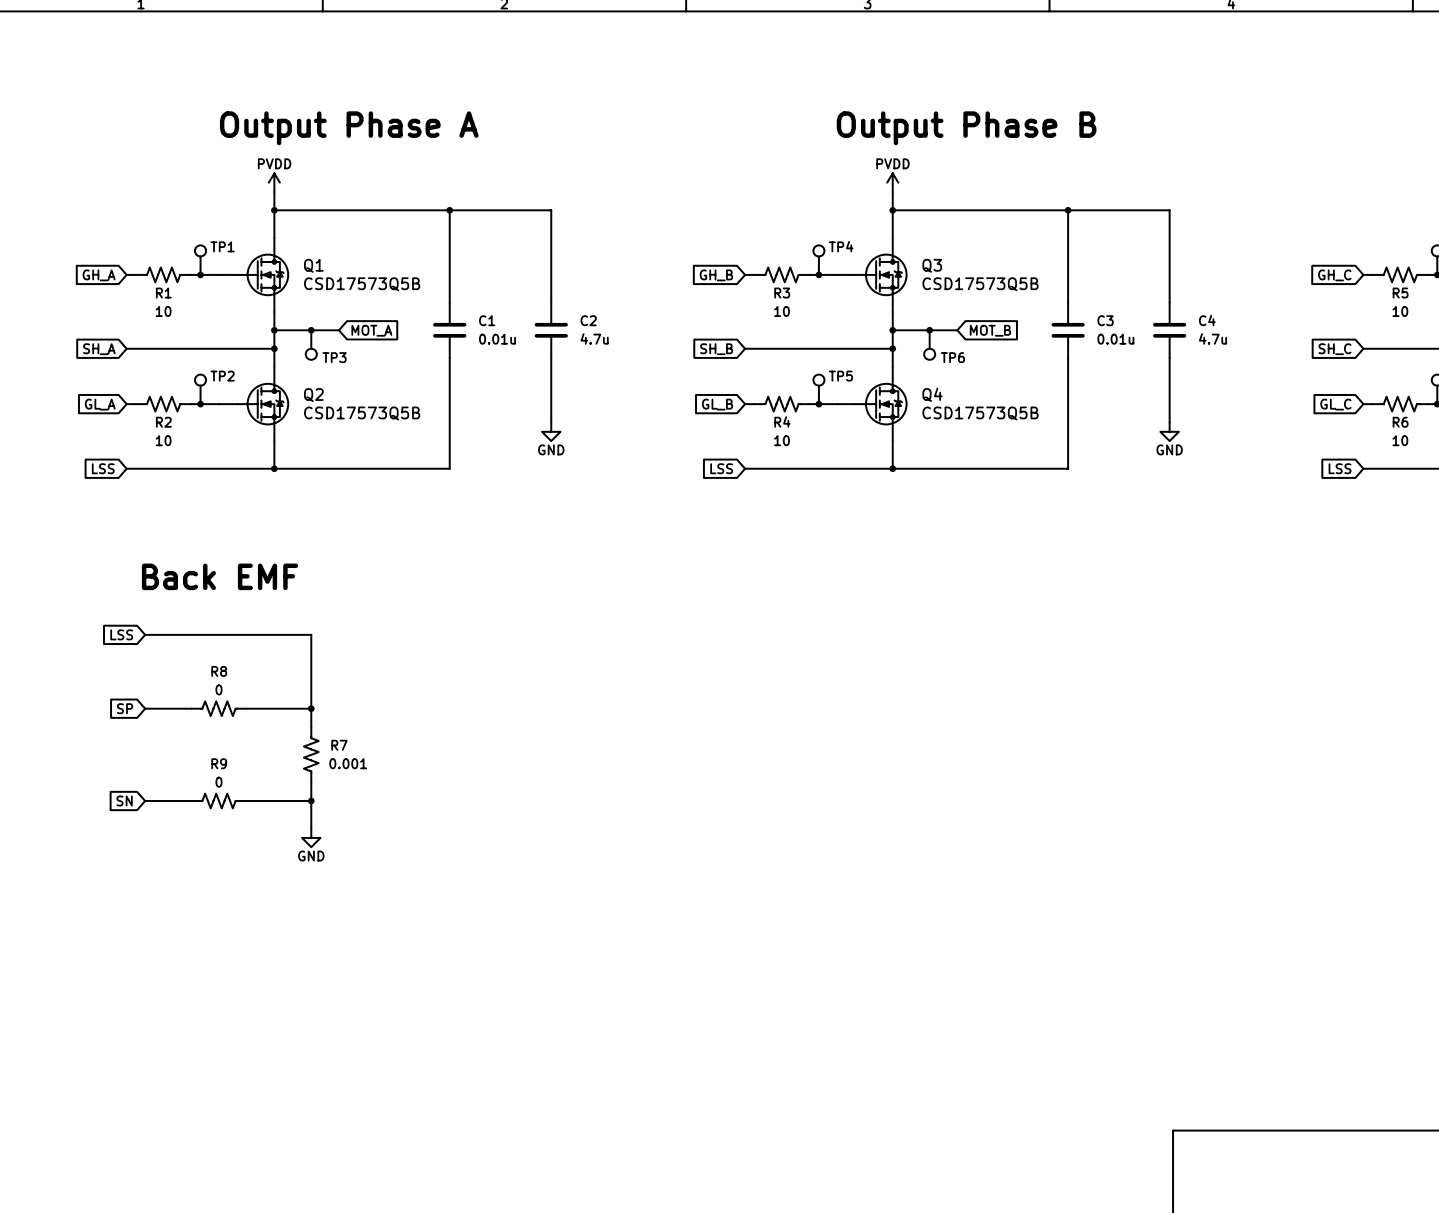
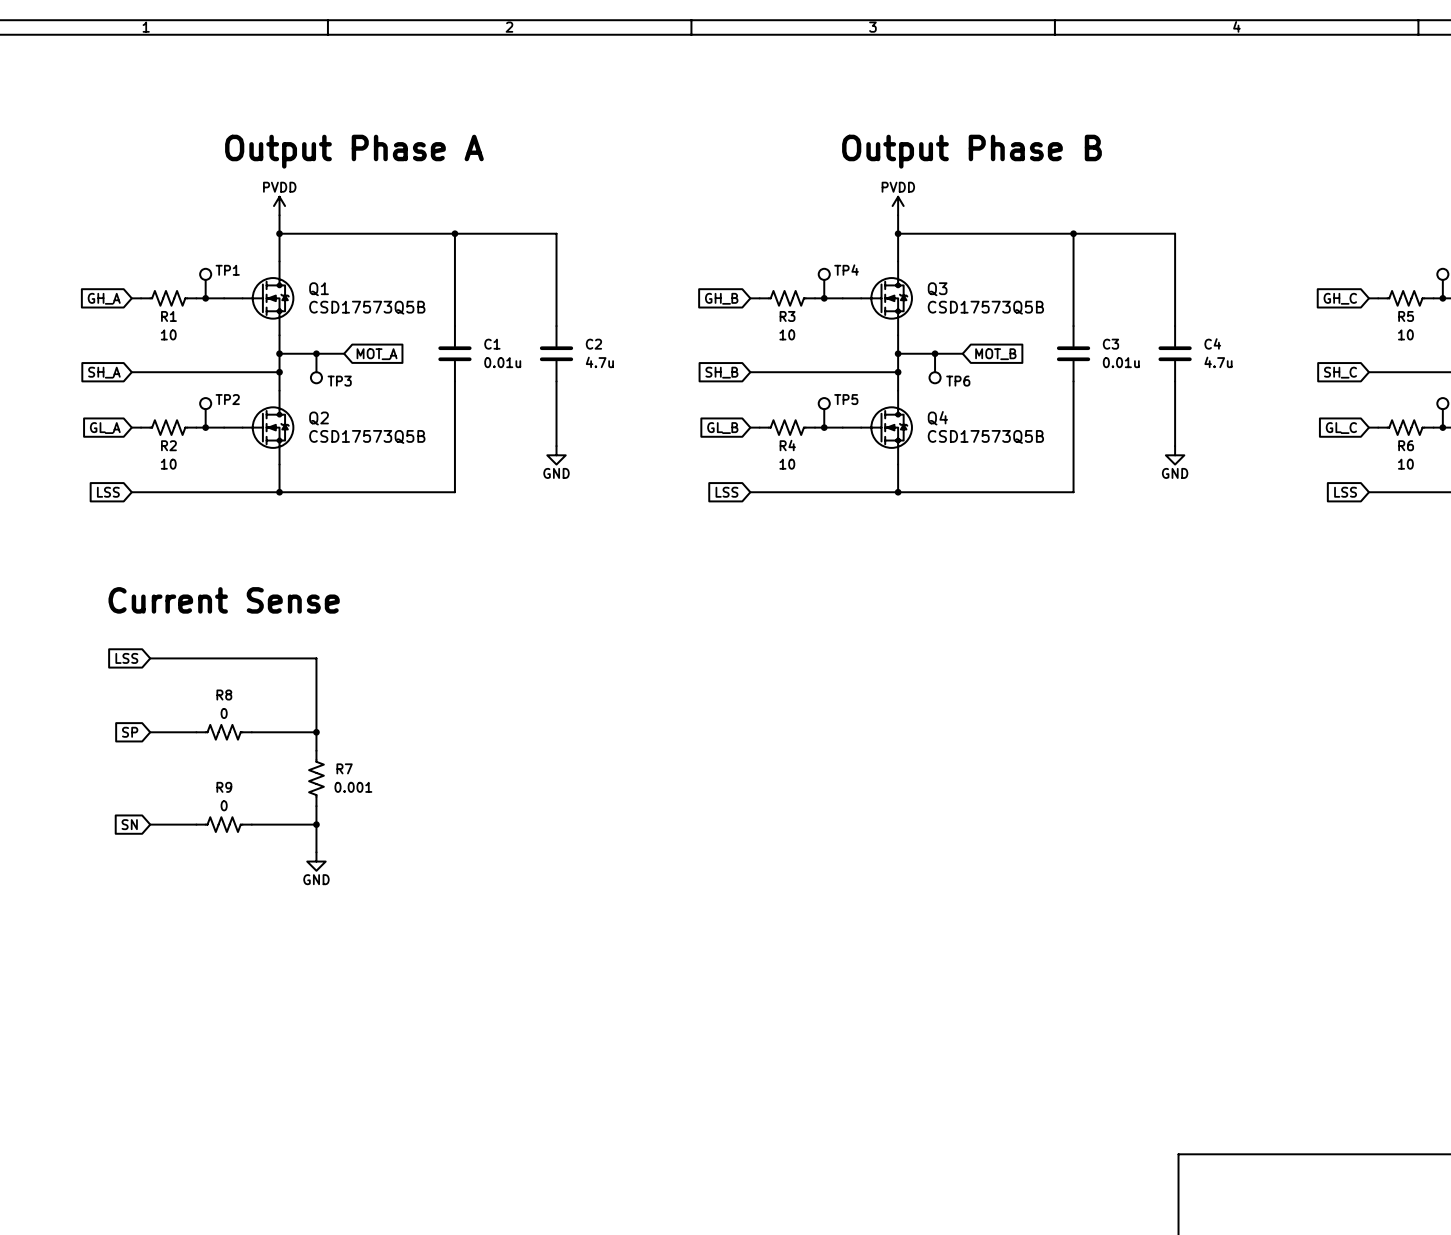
text: Back EMF (220, 576) -> Current Sense (224, 600)

